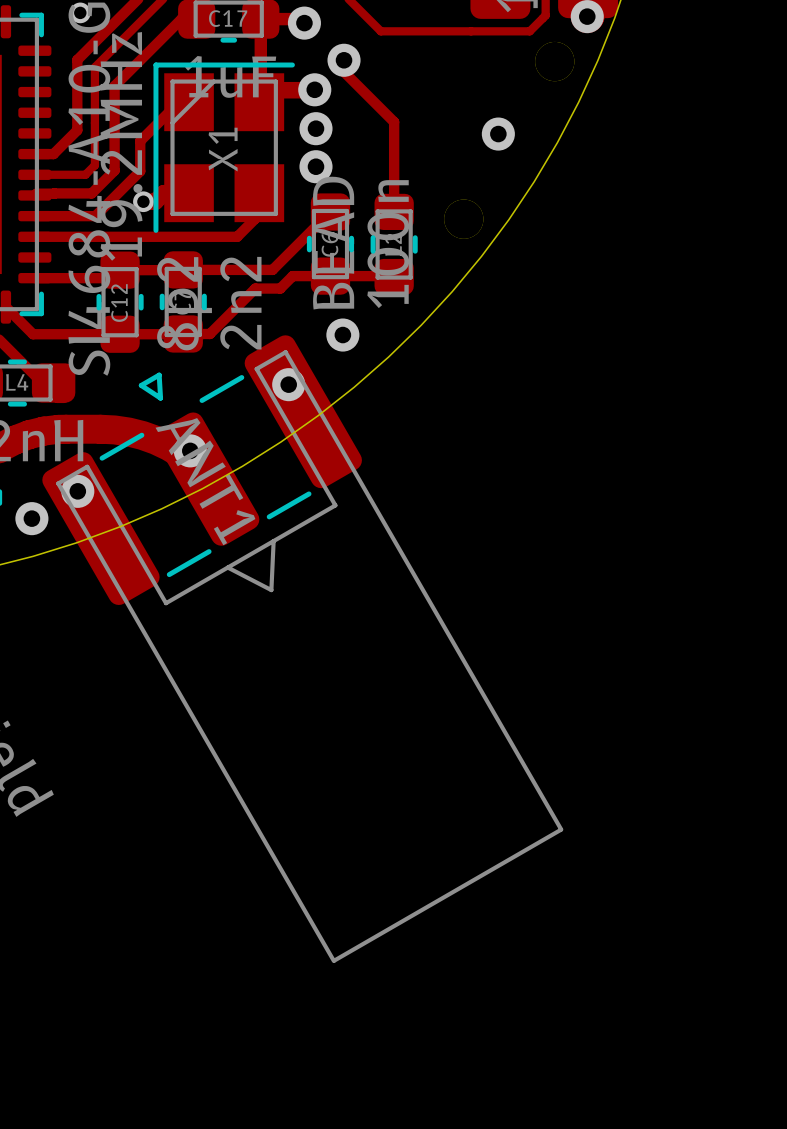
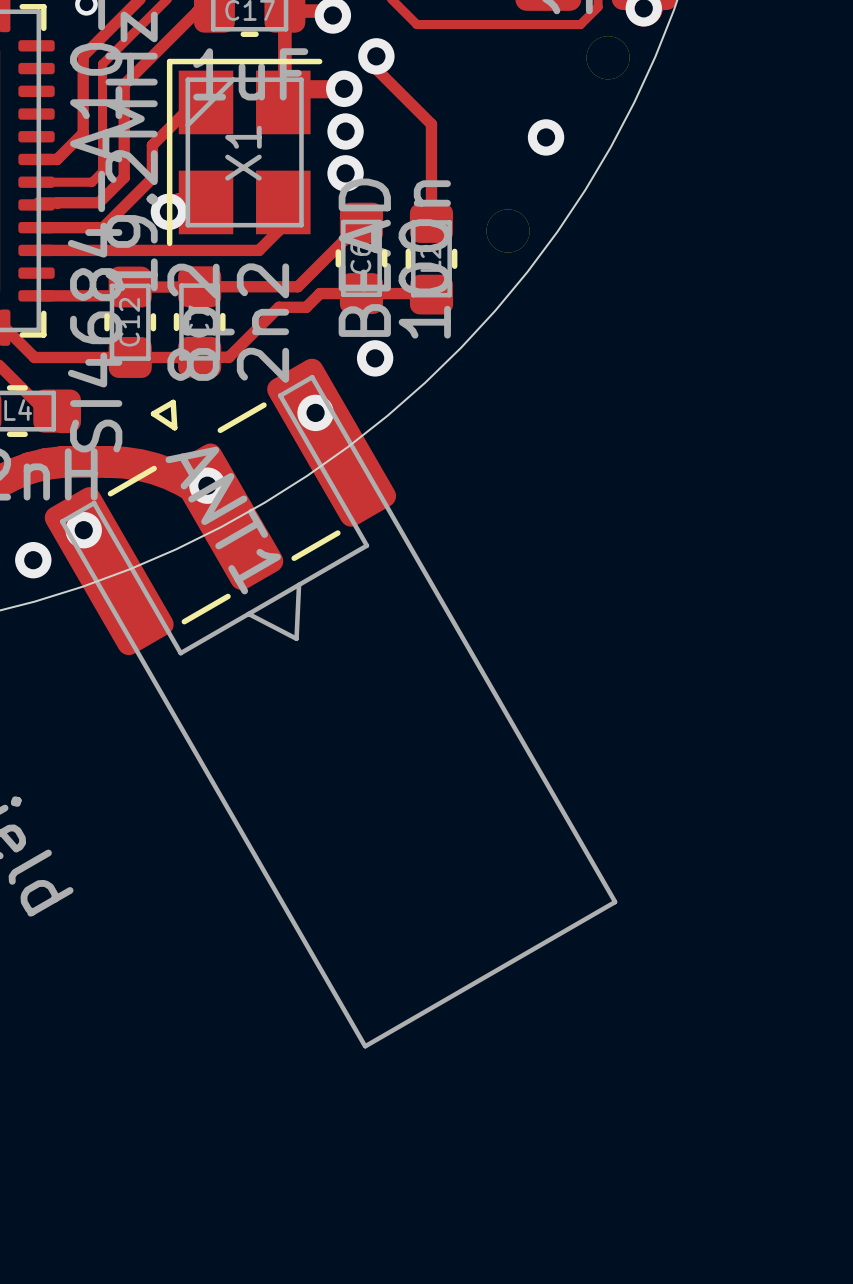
via size: [133, 191, 154, 213] -> [150, 193, 188, 231]

